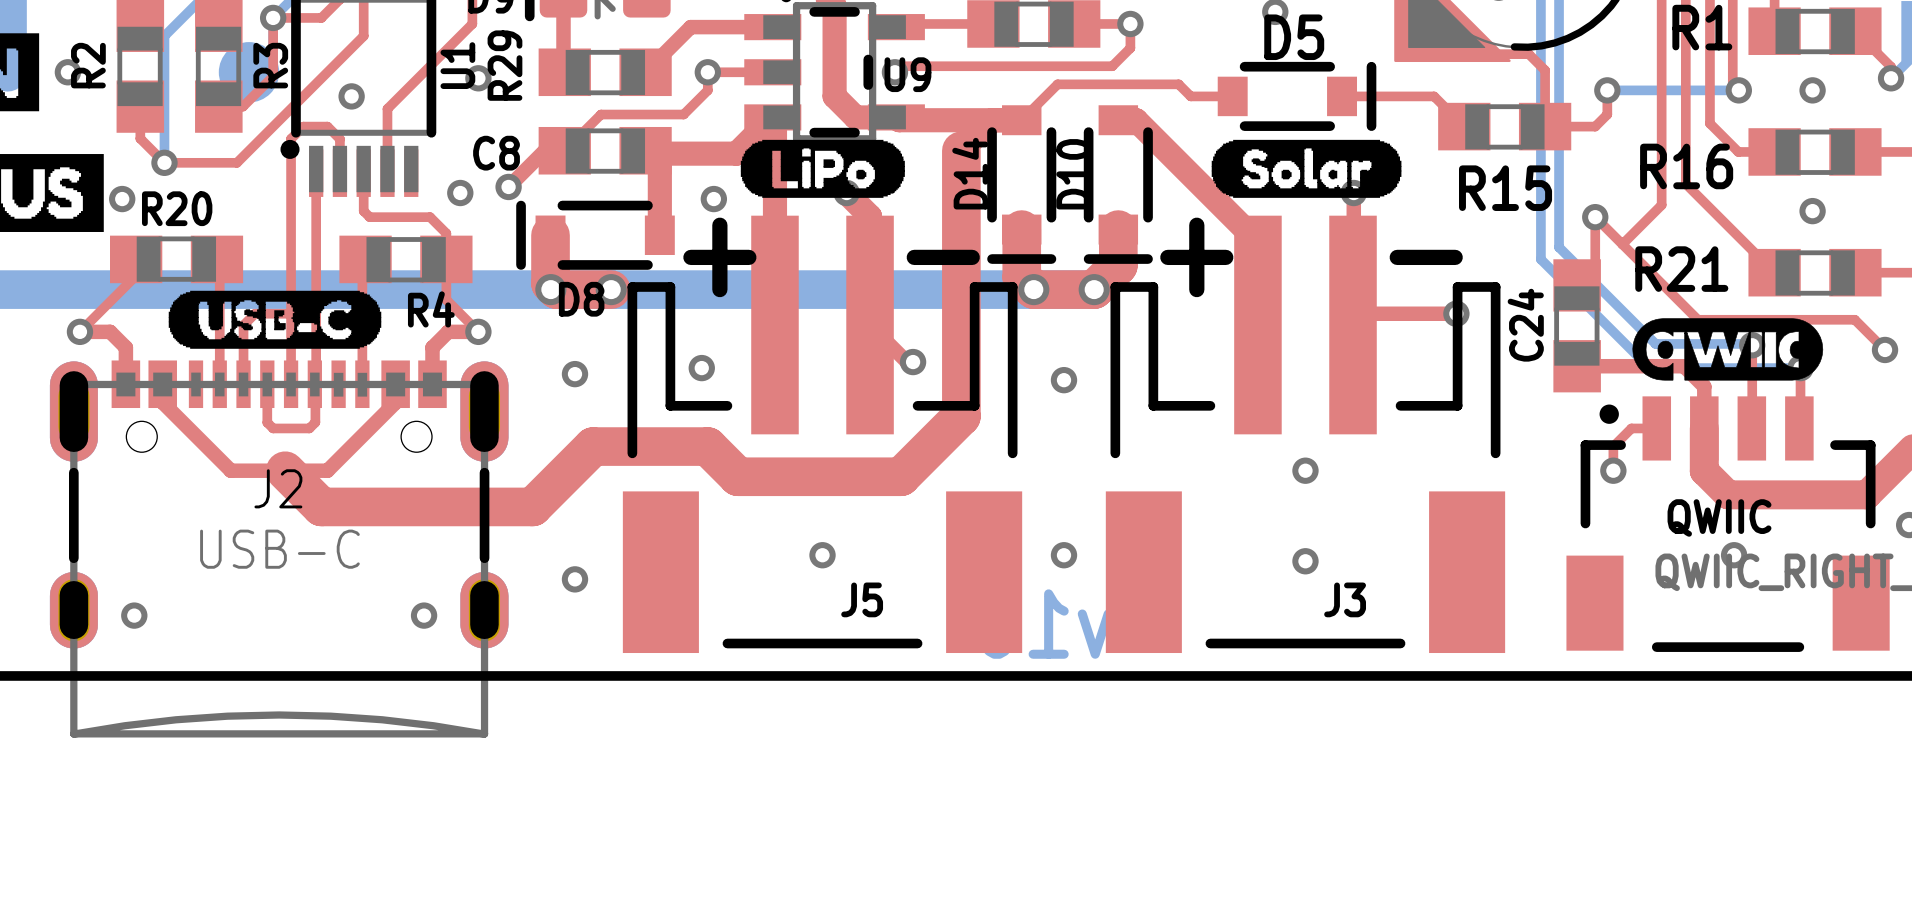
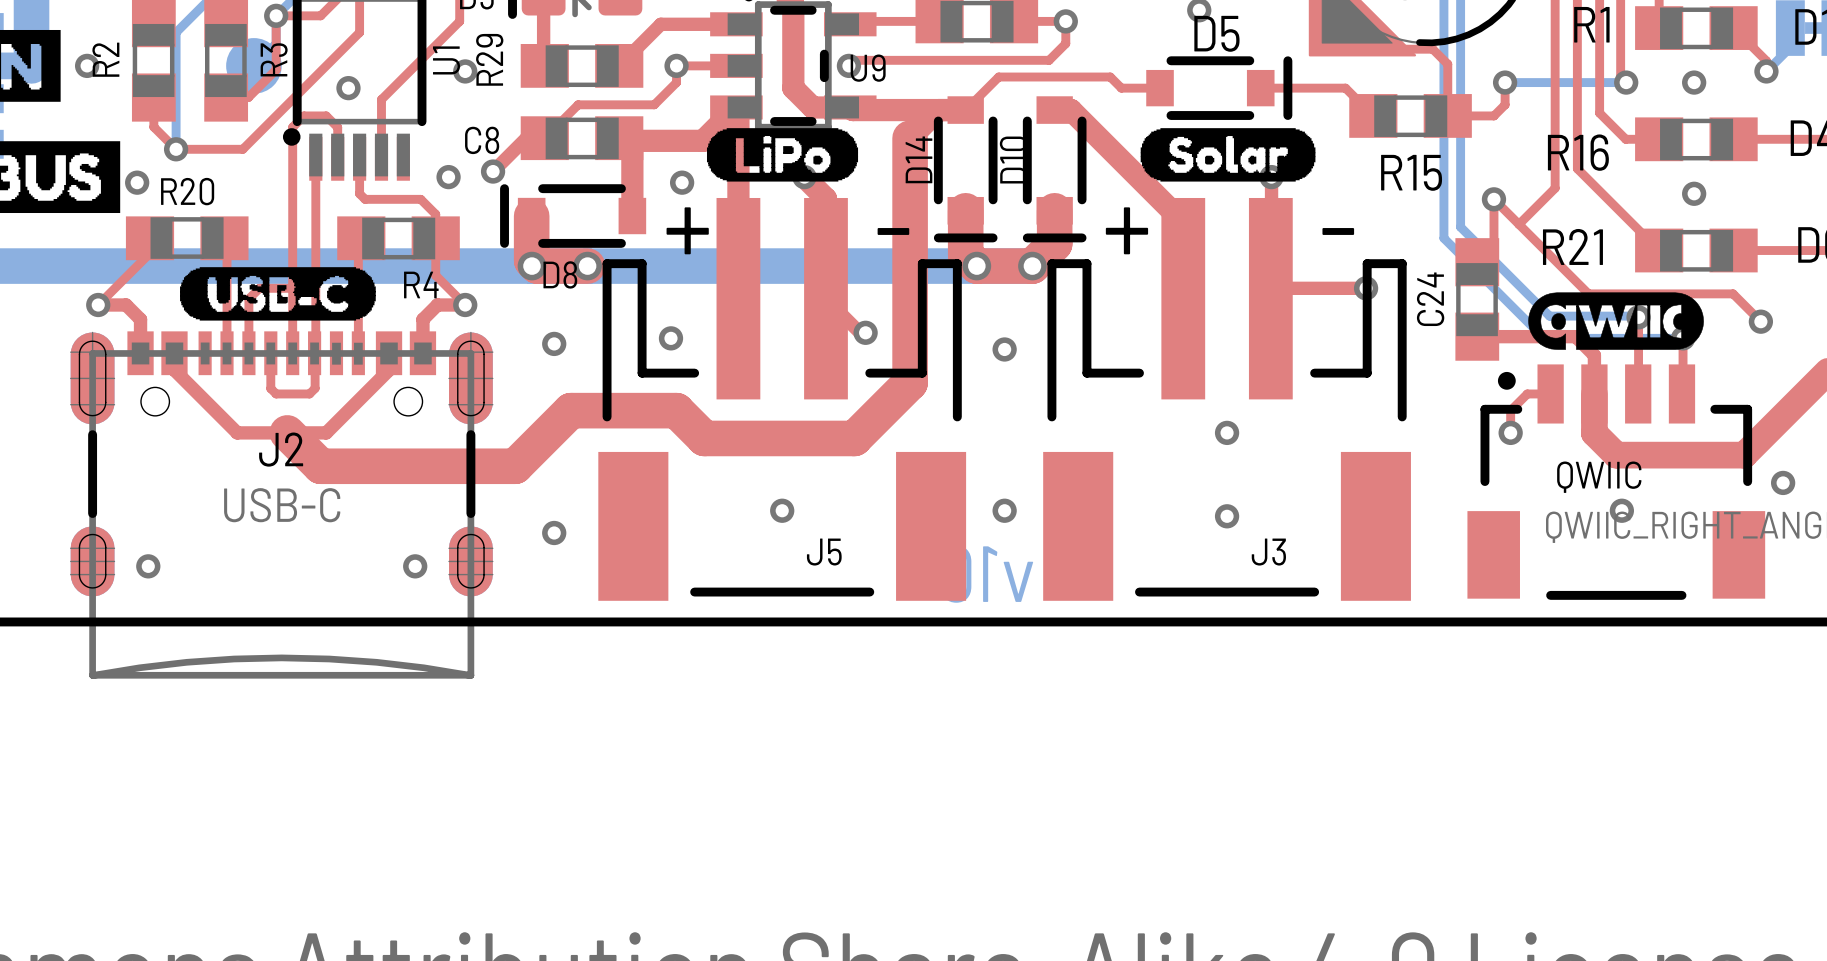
J2 footprint: [49, 360, 509, 738] -> [70, 331, 494, 679]

